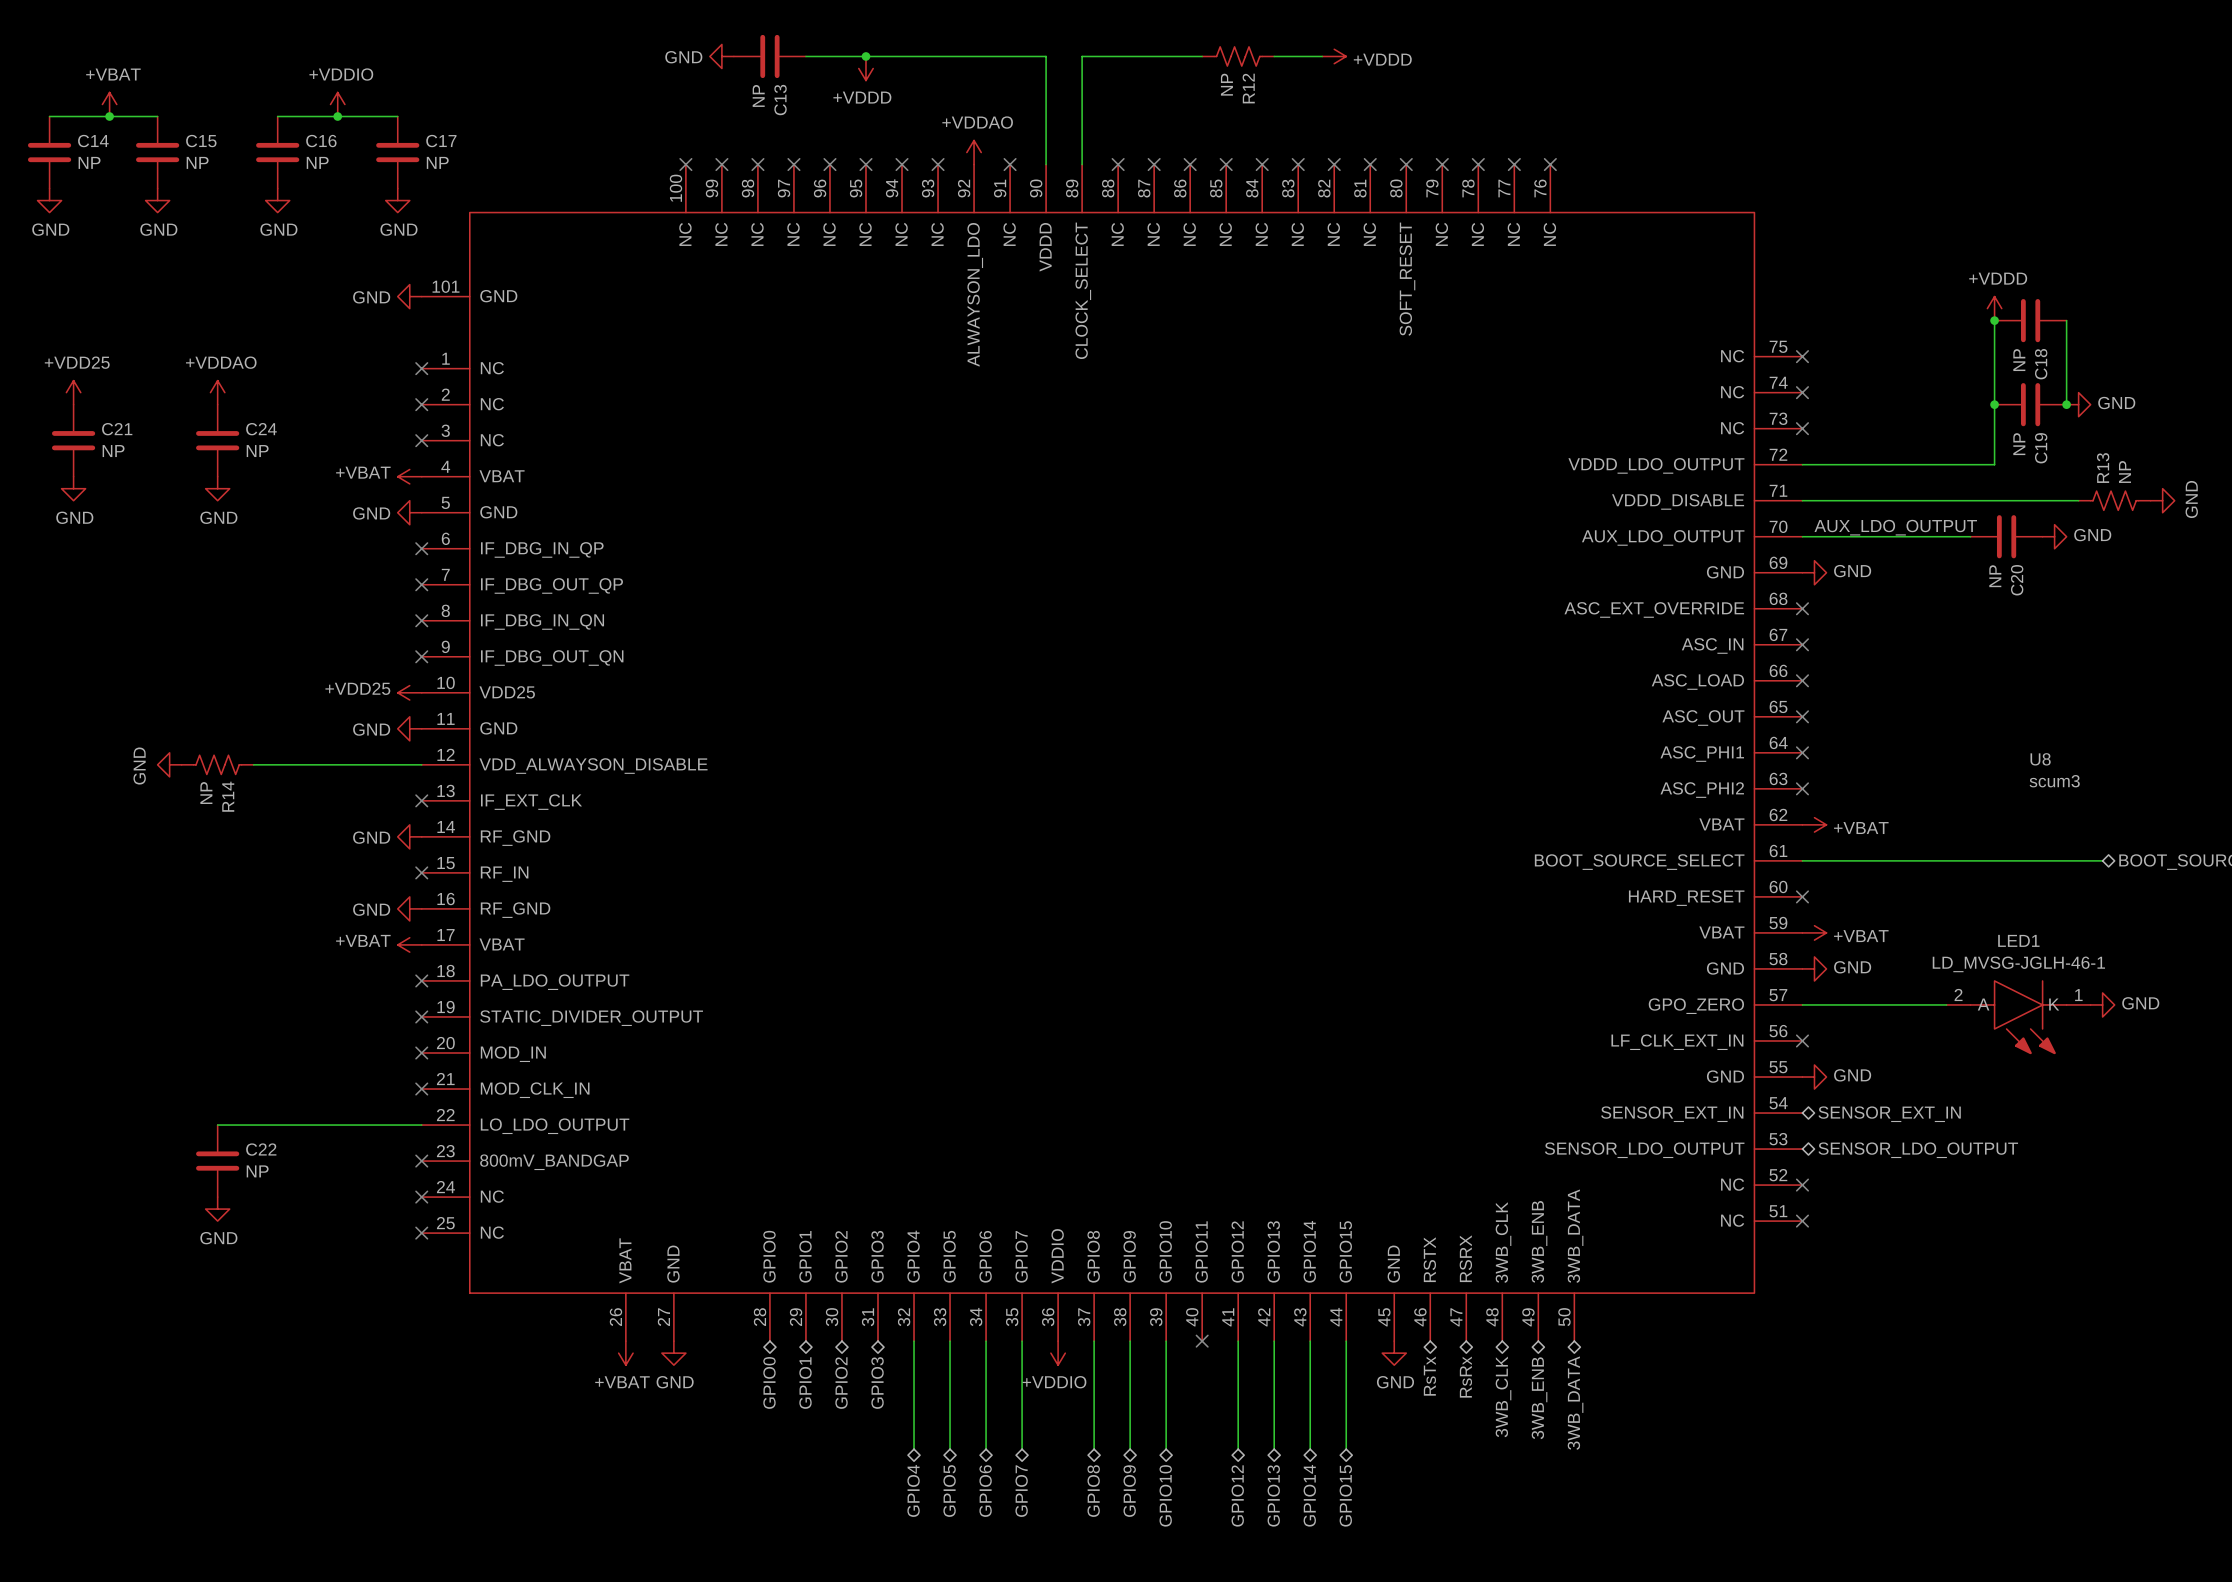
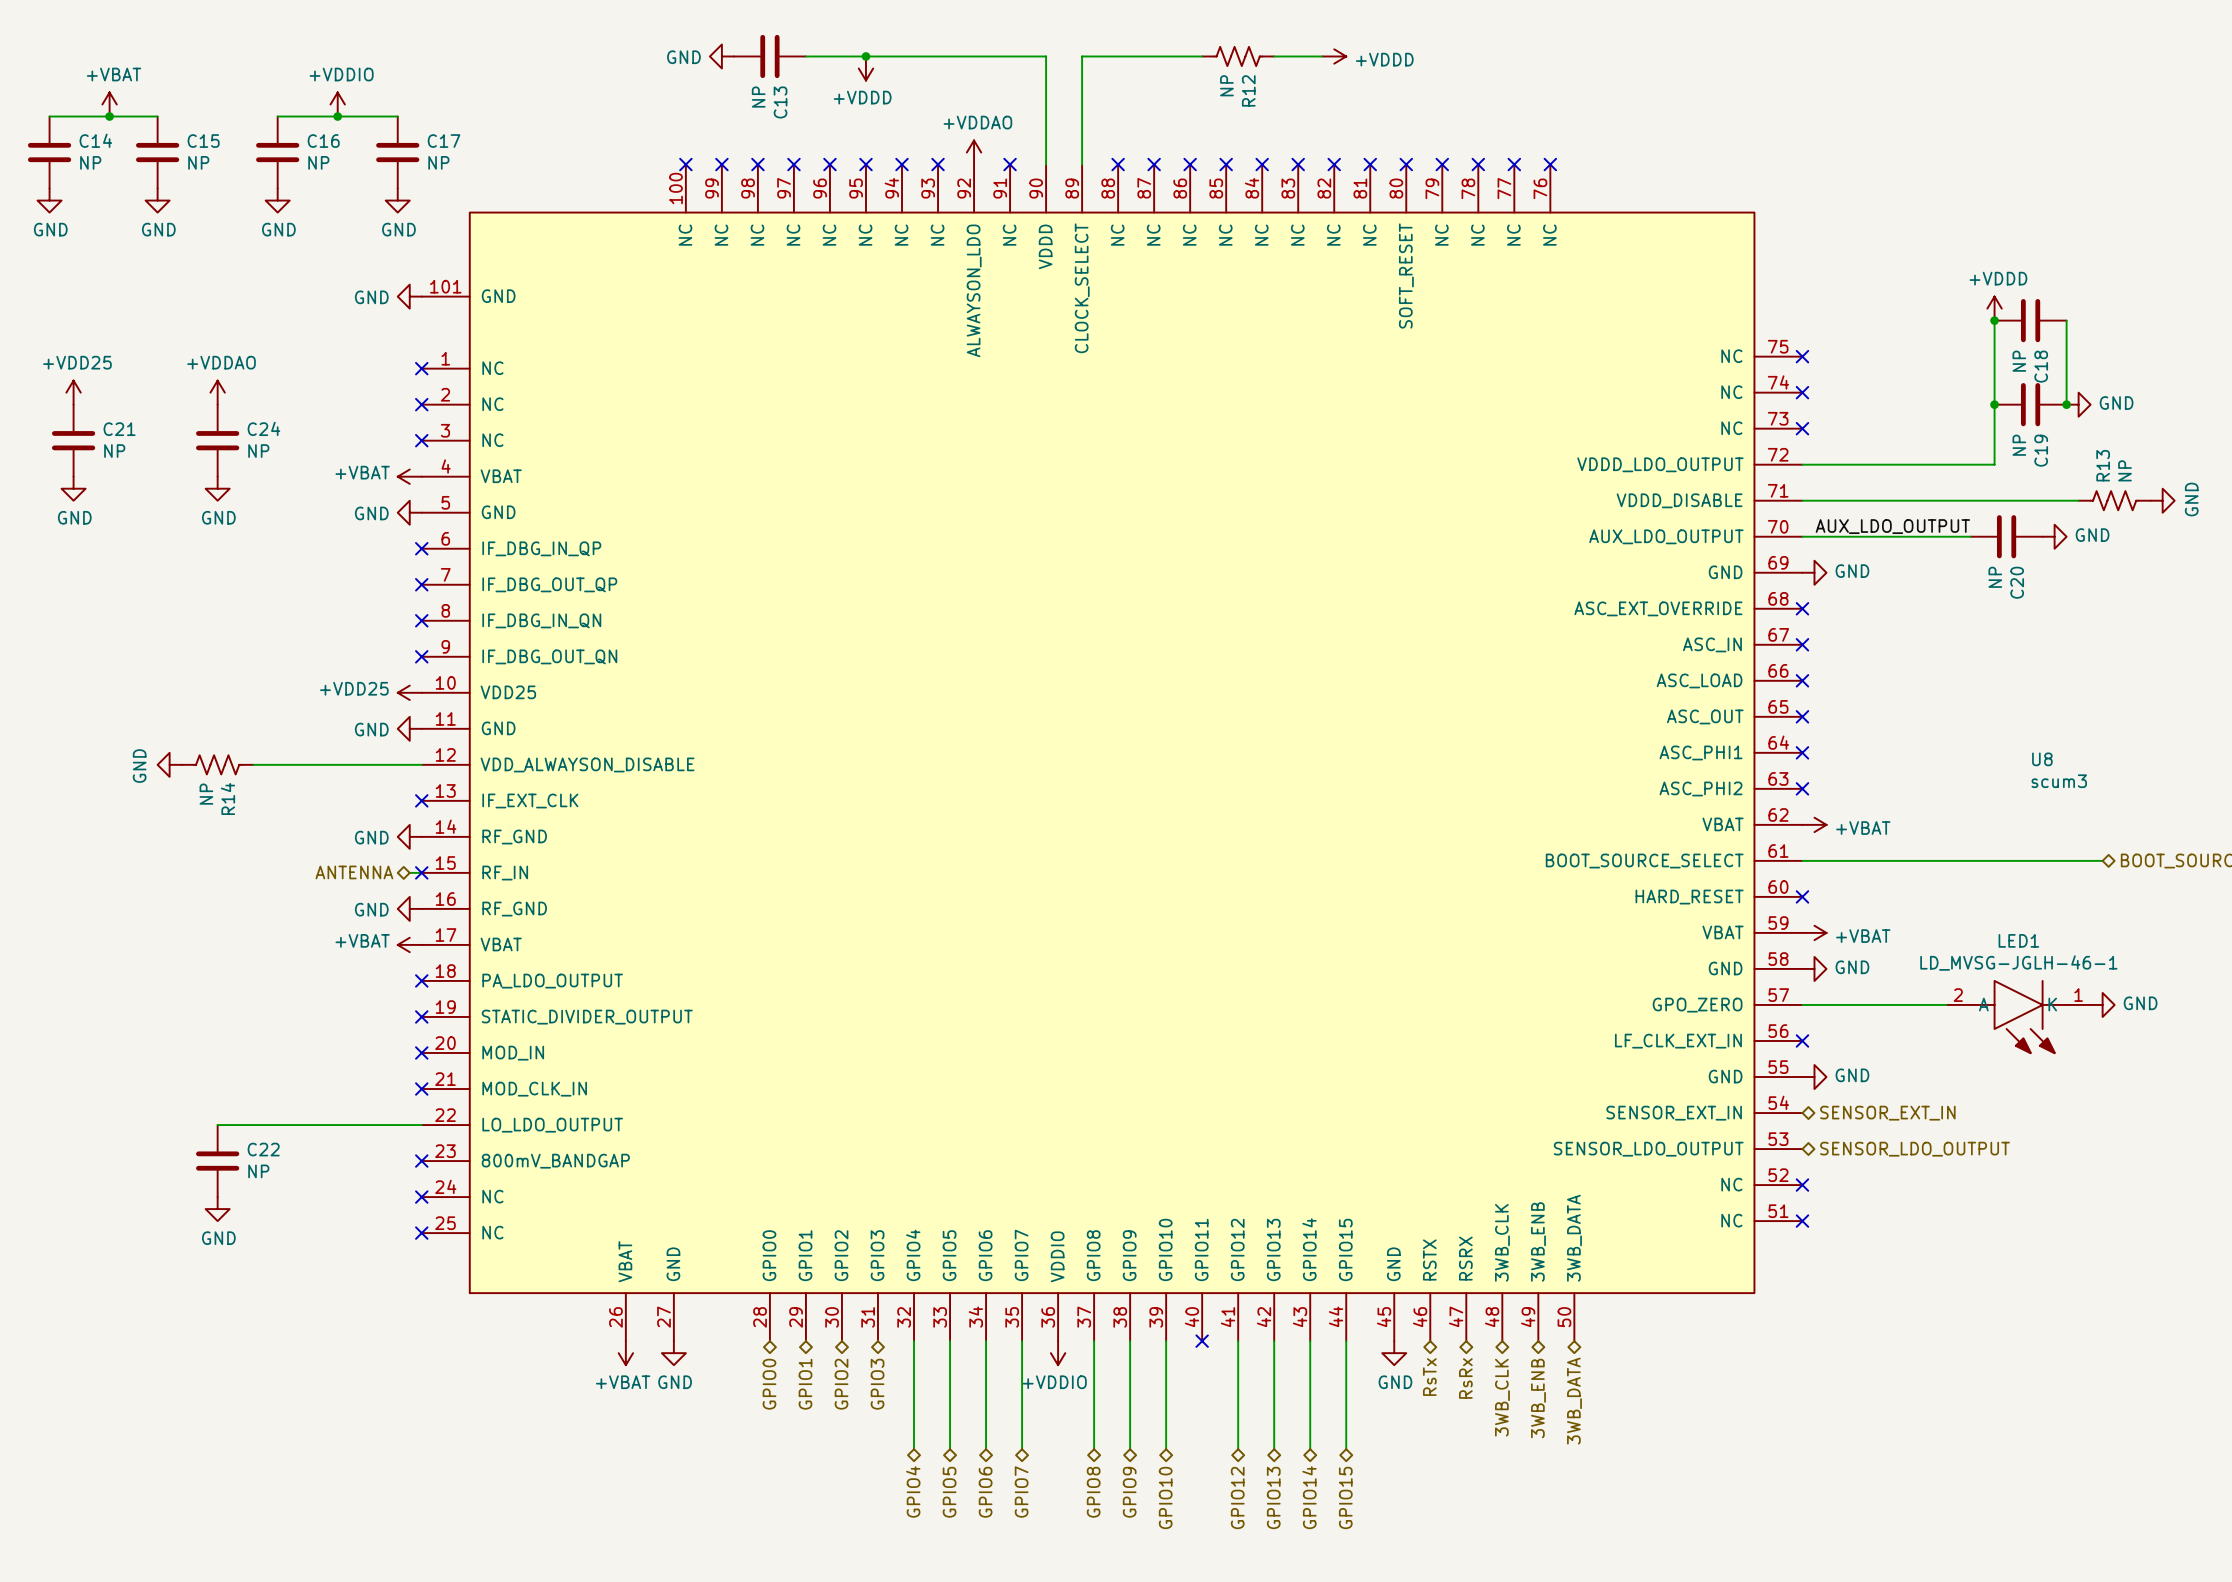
hierarchical label: none -> ANTENNA (354, 872)
wire: none -> (409, 872) (421, 872)

